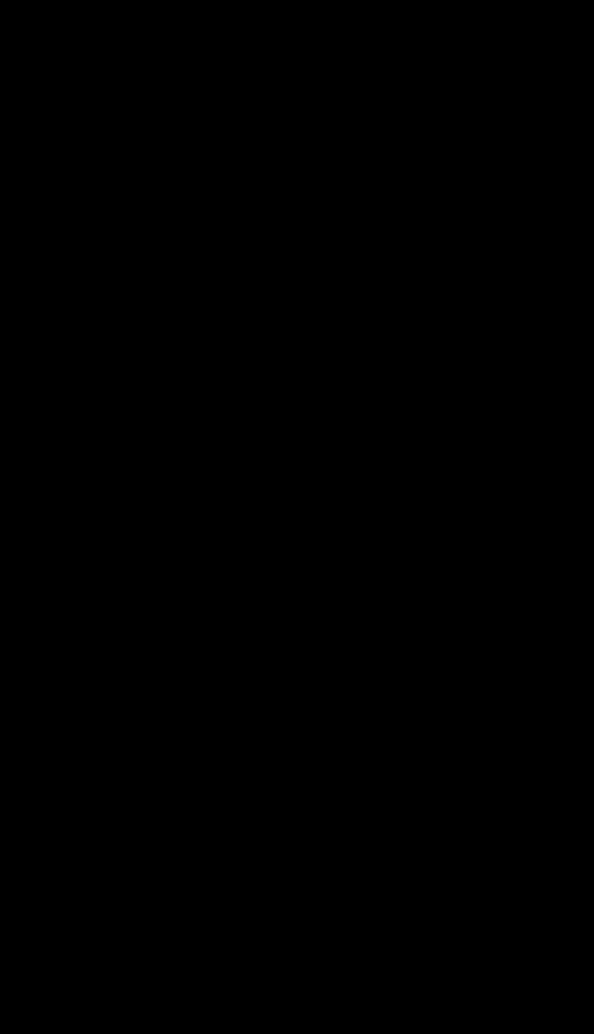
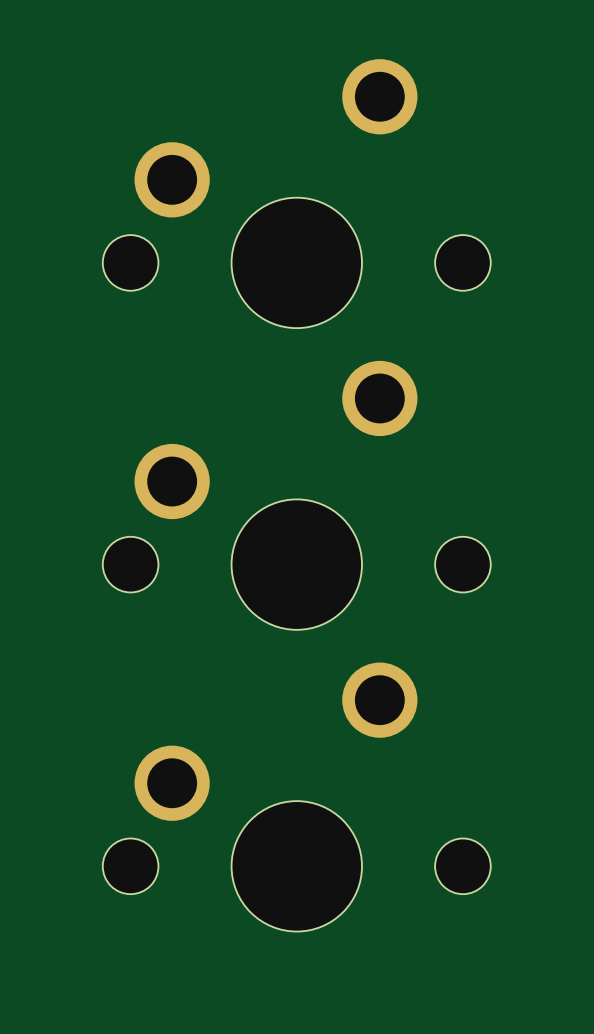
part: none -> (296, 193)
part: none -> (296, 495)
part: none -> (296, 797)

